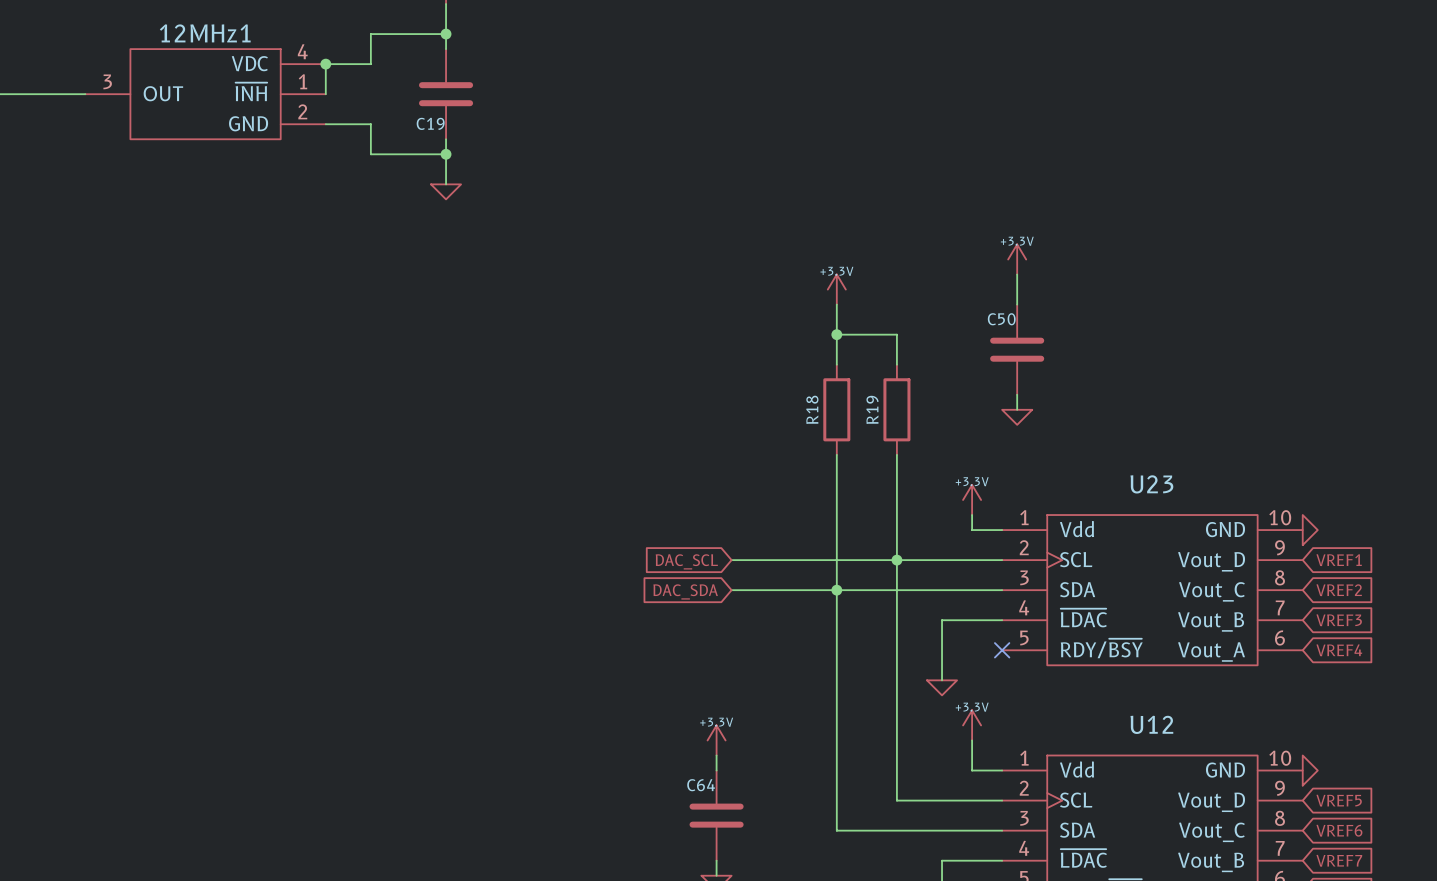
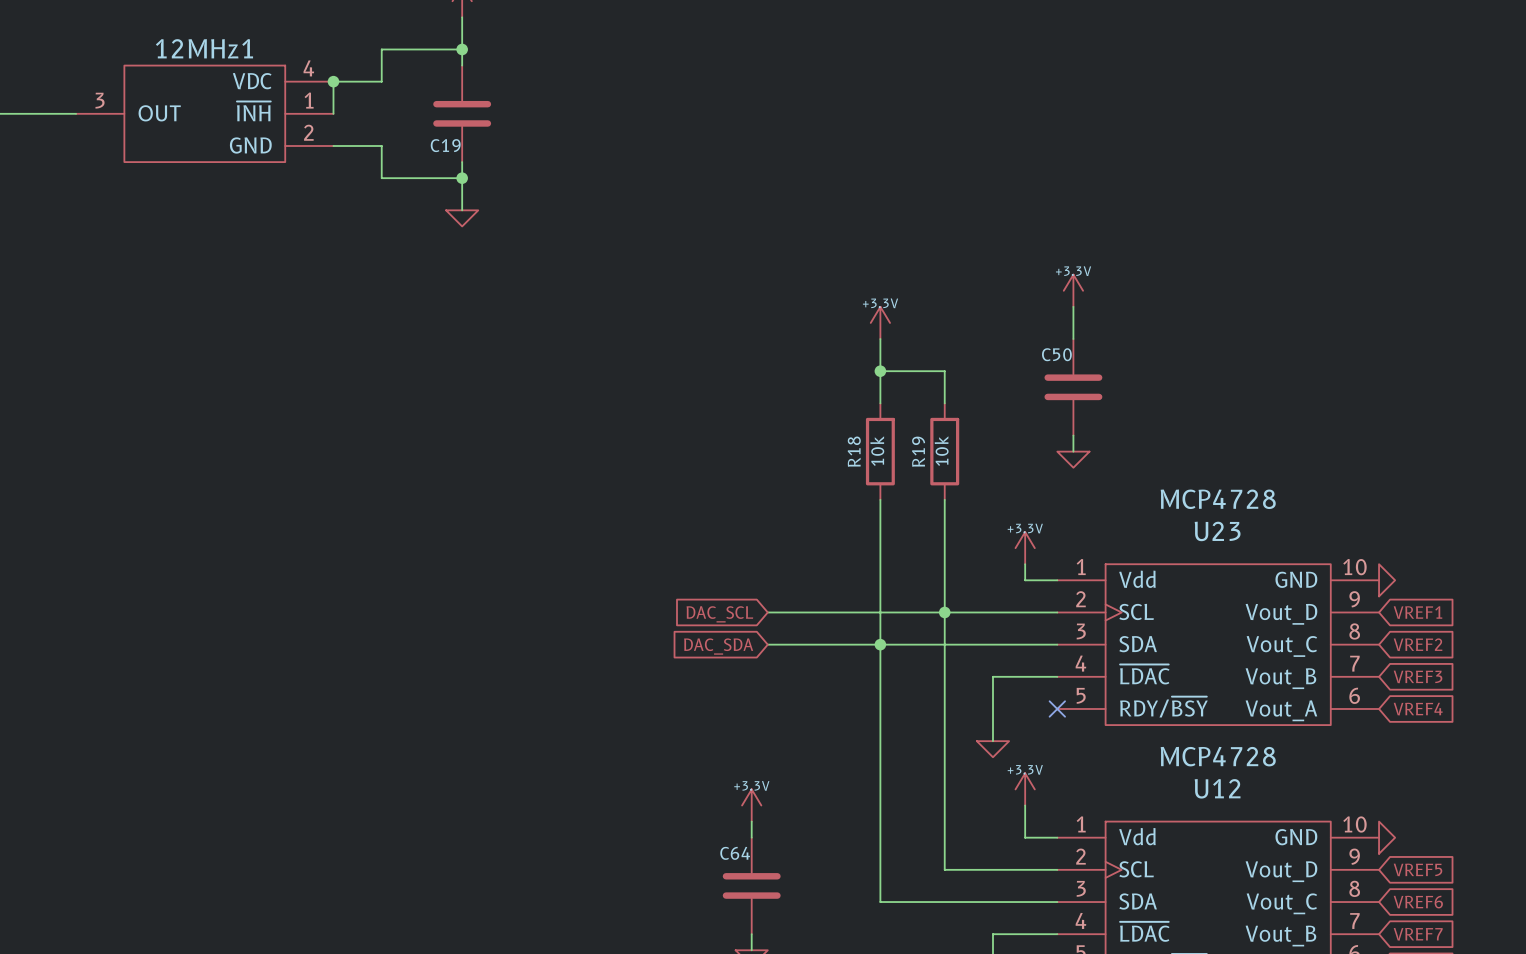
R18 value: none -> 10k (877, 451)
R19 value: none -> 10k (941, 451)
U23 value: none -> MCP4728 (1218, 499)
U12 value: none -> MCP4728 (1218, 756)

